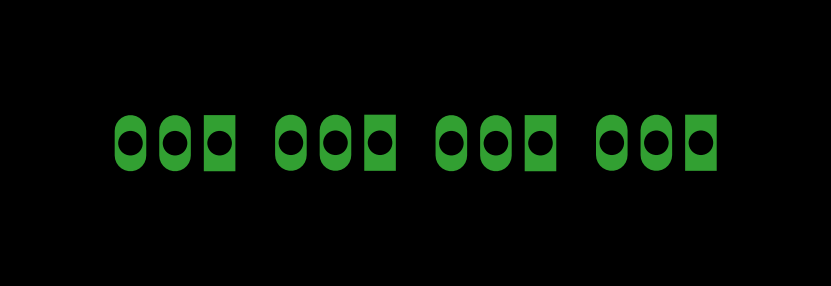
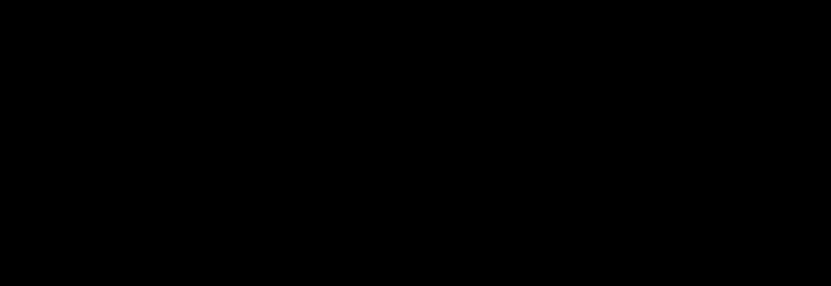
part: (335, 142) -> none
part: (656, 142) -> none
part: (175, 143) -> none
part: (495, 143) -> none

